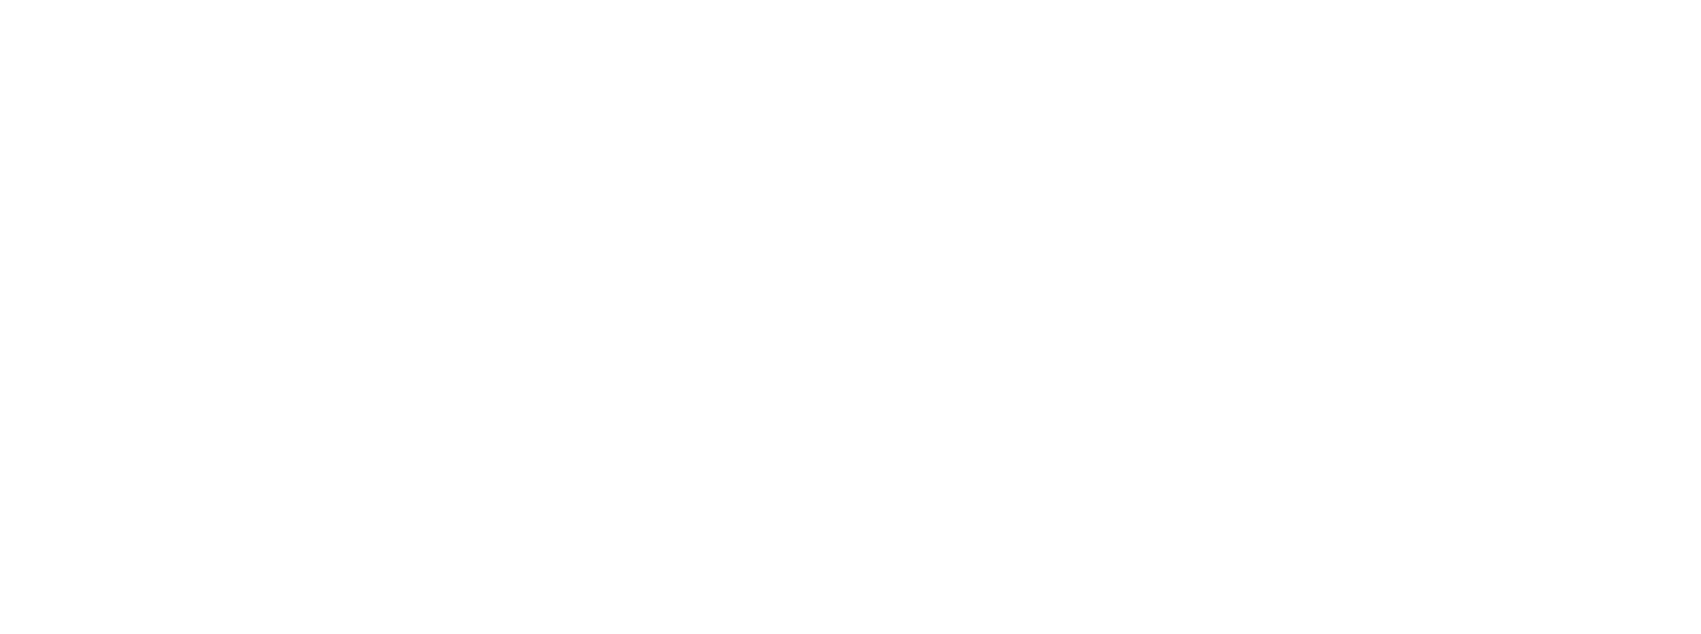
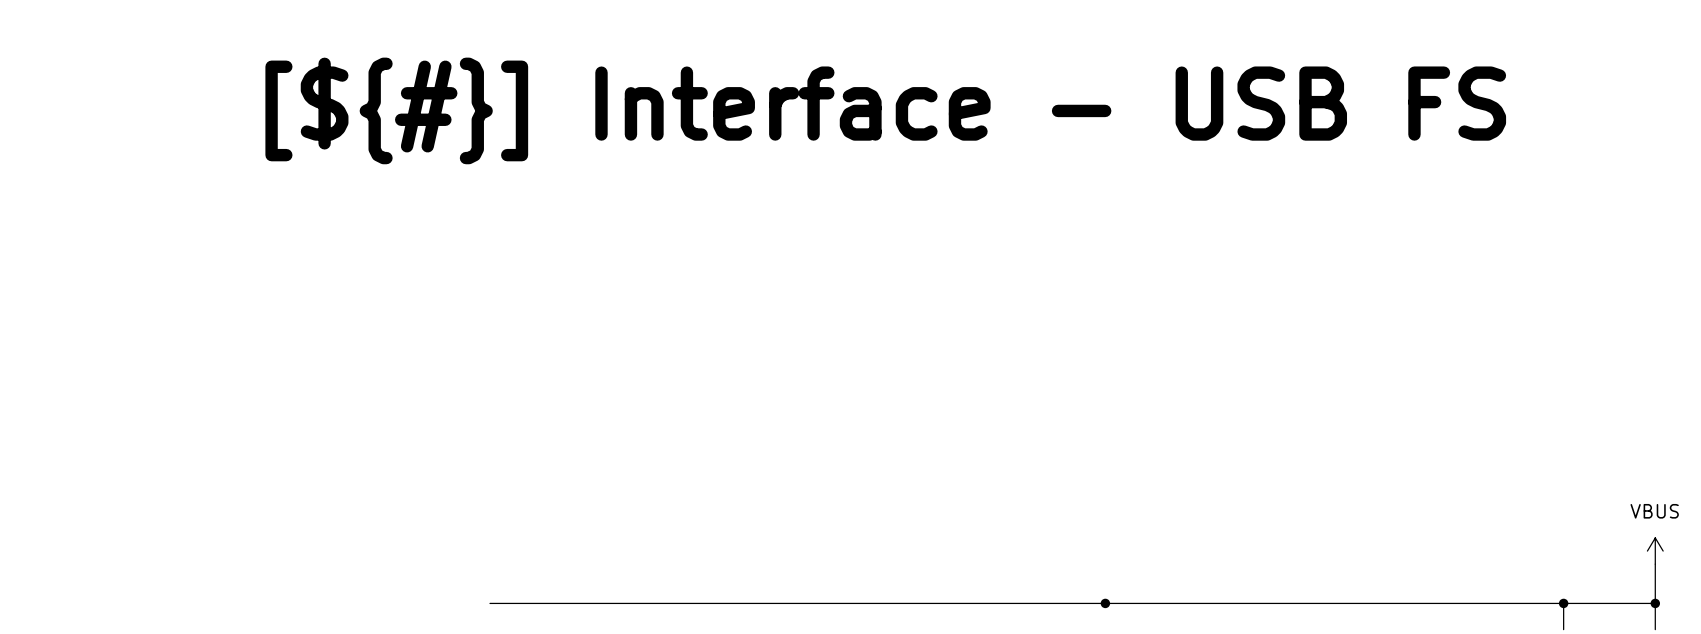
text: none -> [${#}] Interface - USB FS (885, 110)
power symbol: none -> VBUS (1655, 551)
wire: none -> (1655, 564) (1655, 629)
wire: none -> (490, 603) (1655, 603)
junction: none -> (1105, 603)
wire: none -> (1563, 603) (1563, 629)
junction: none -> (1563, 603)
junction: none -> (1655, 603)

